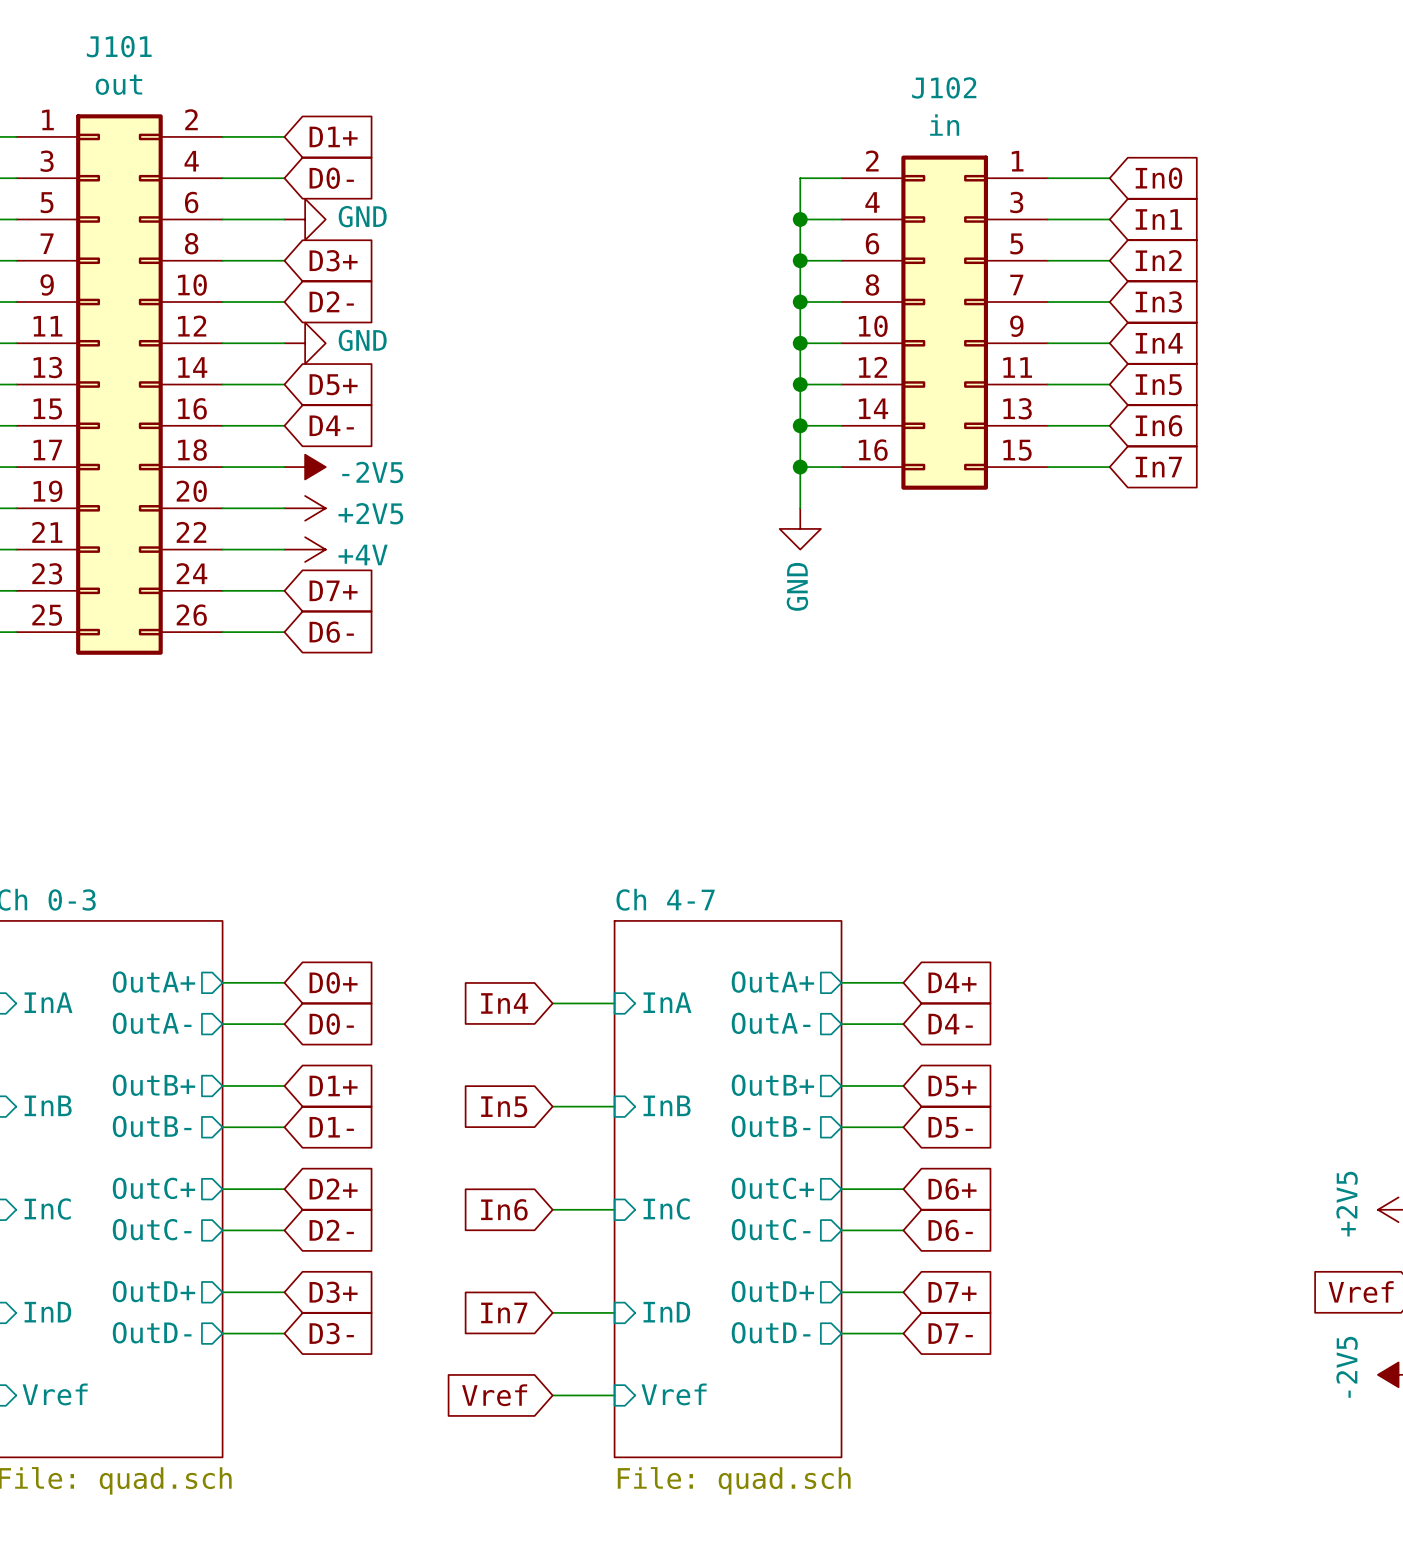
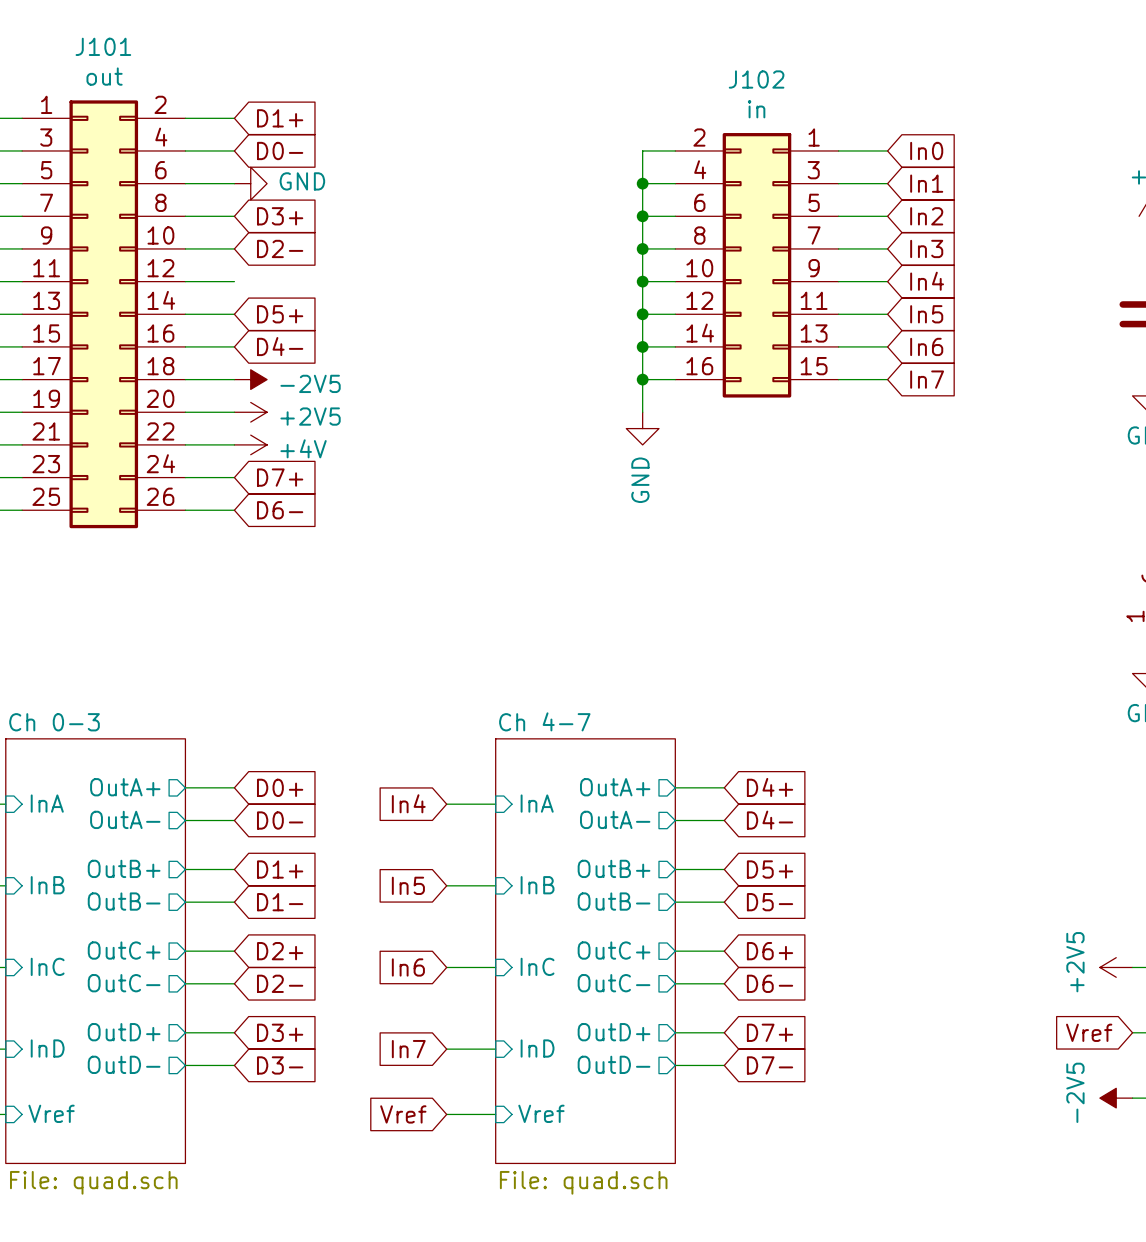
power symbol: GND (305, 343) -> none

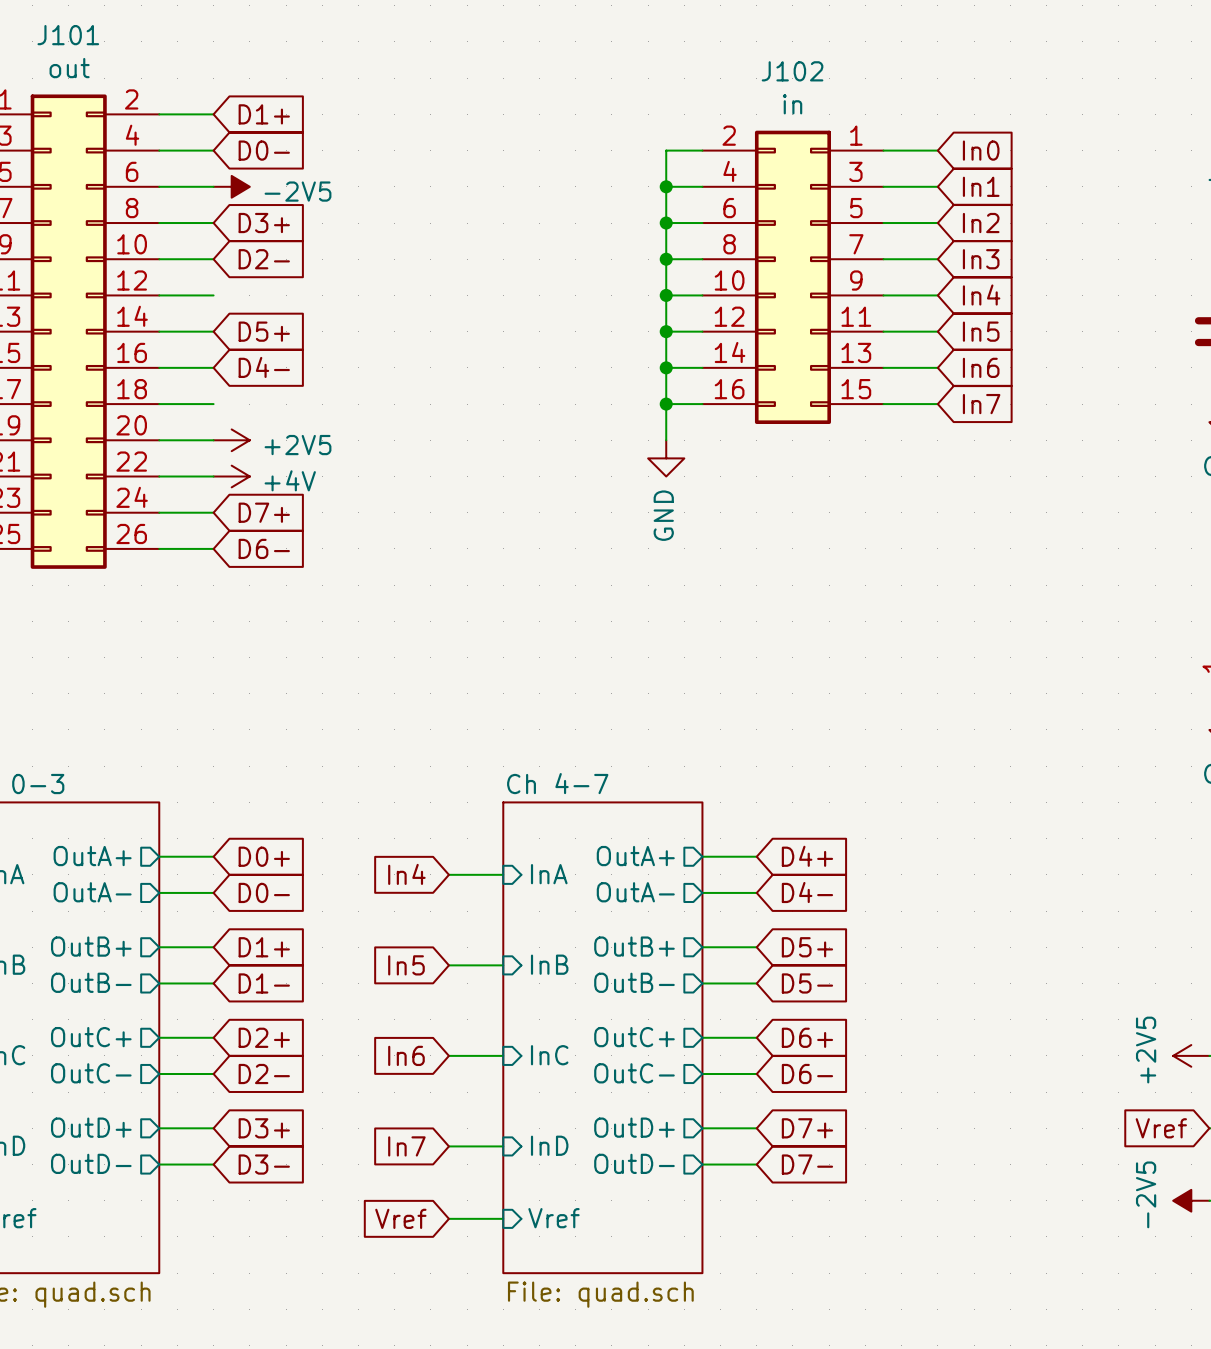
power symbol: GND (250, 183) -> -2V5 (231, 186)
power symbol: -2V5 (250, 379) -> none

